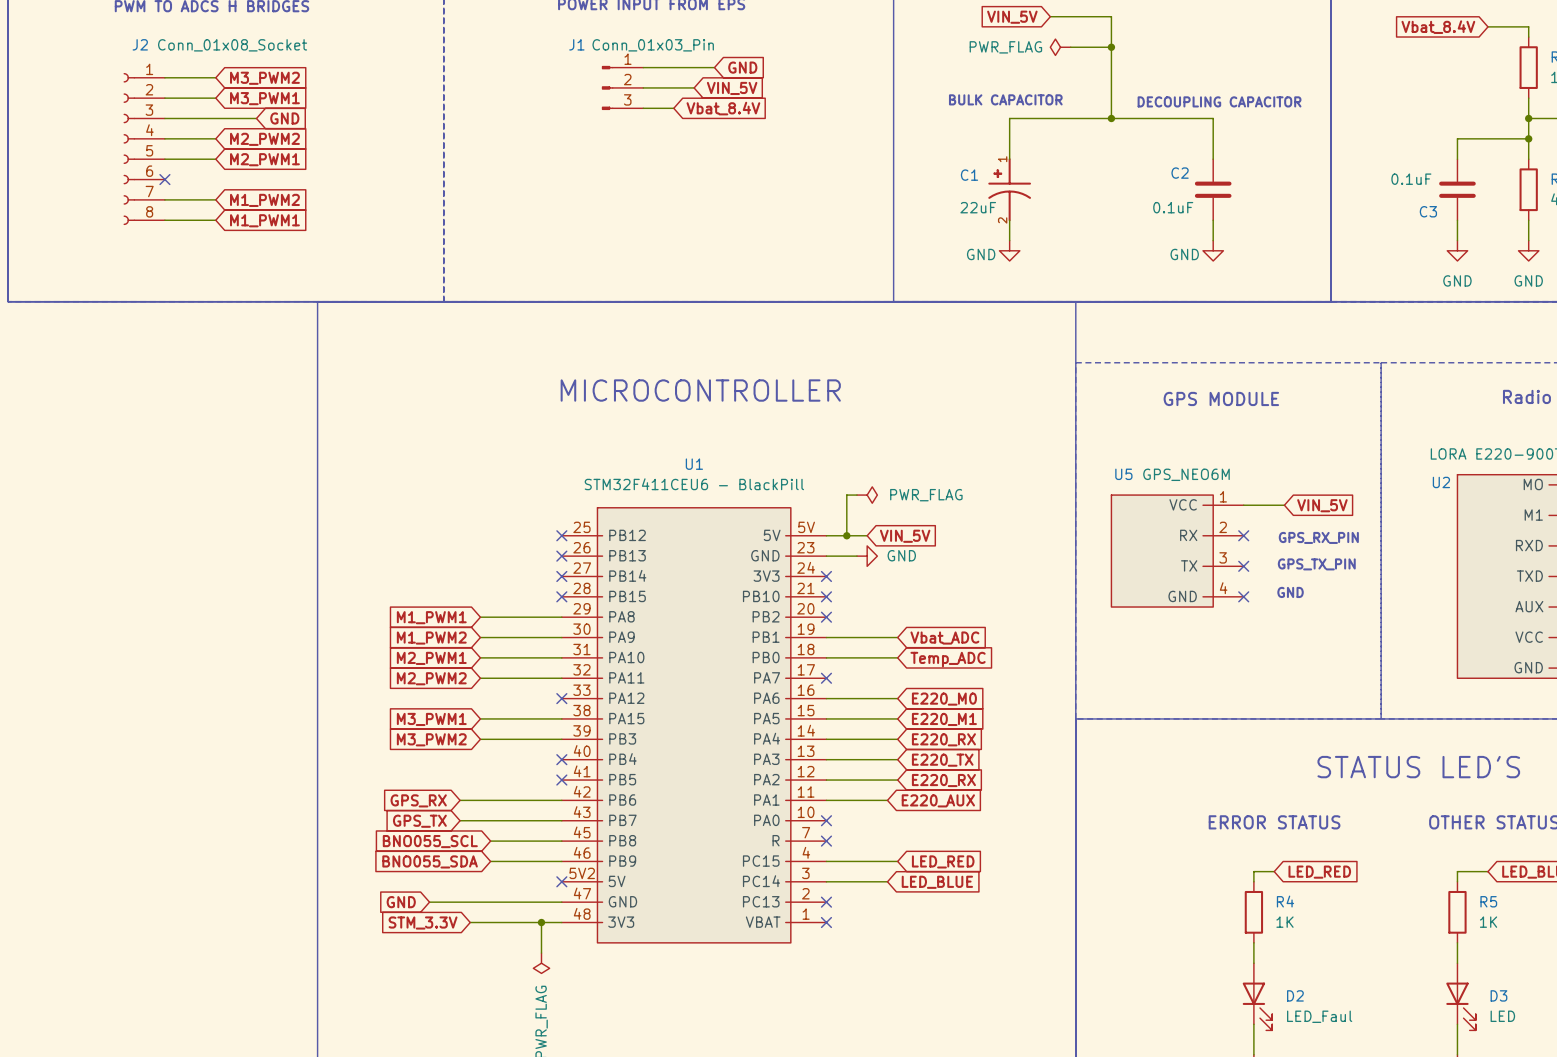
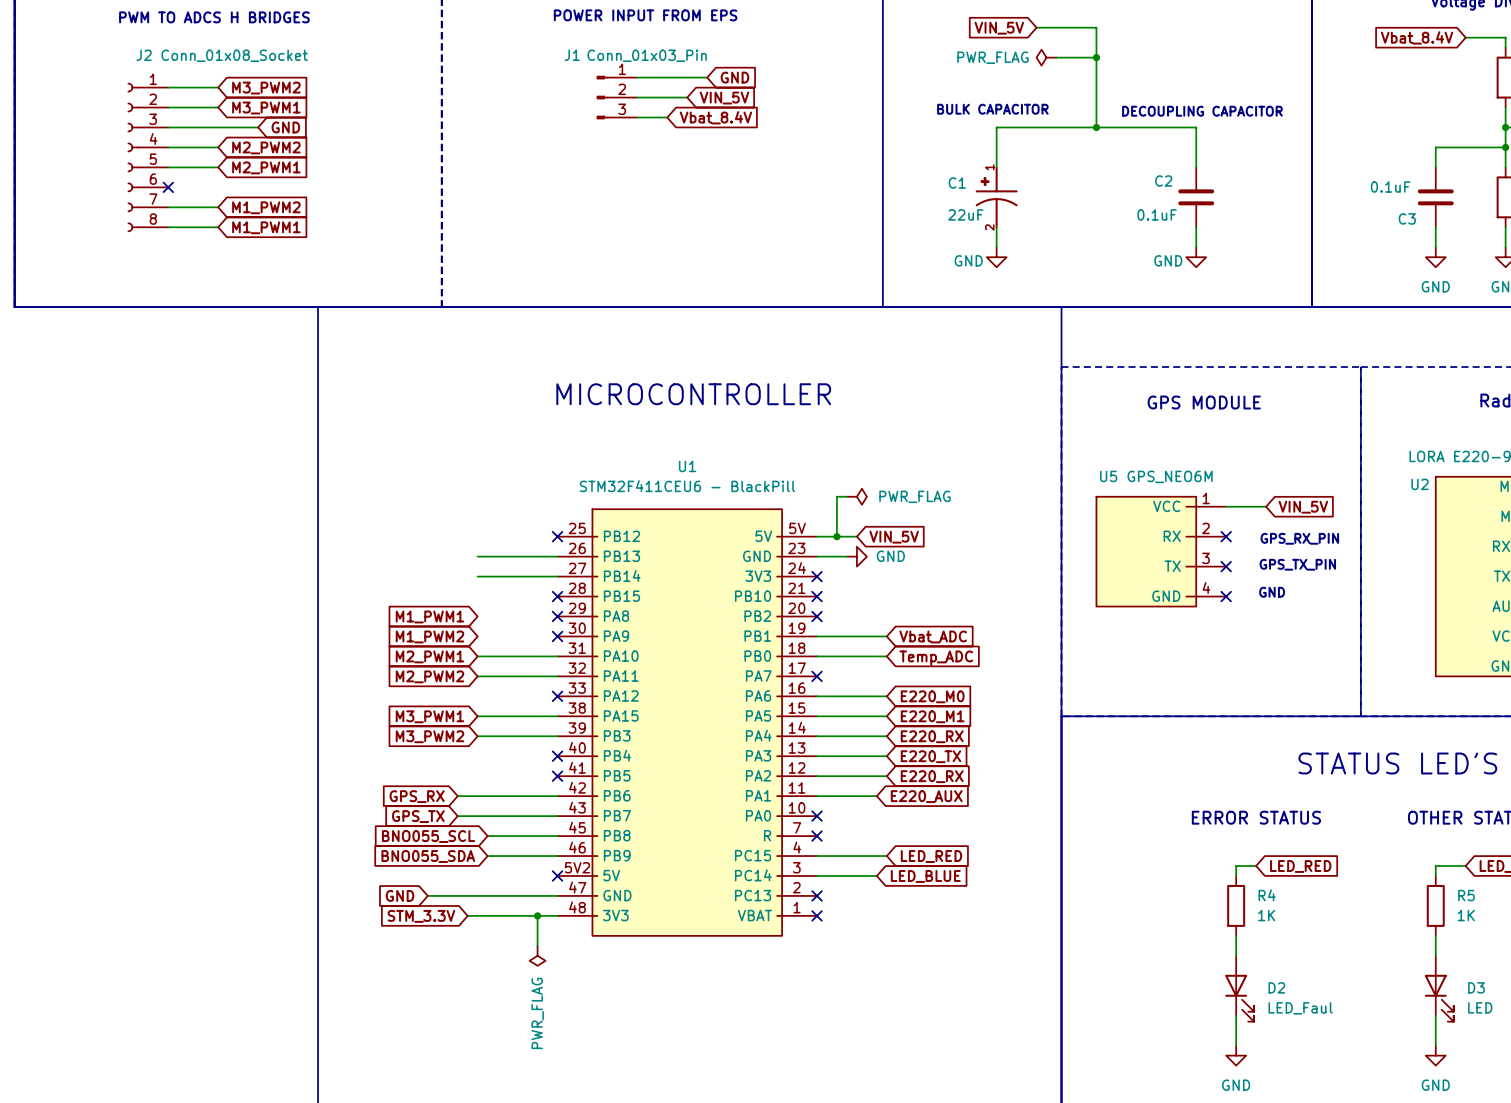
no-connect mark: (561, 556) -> none
no-connect mark: (561, 576) -> none
wire: (480, 617) (561, 617) -> (477, 556) (557, 556)
no-connect mark: none -> (557, 616)
wire: (480, 637) (561, 637) -> (477, 576) (557, 576)
no-connect mark: none -> (557, 636)

